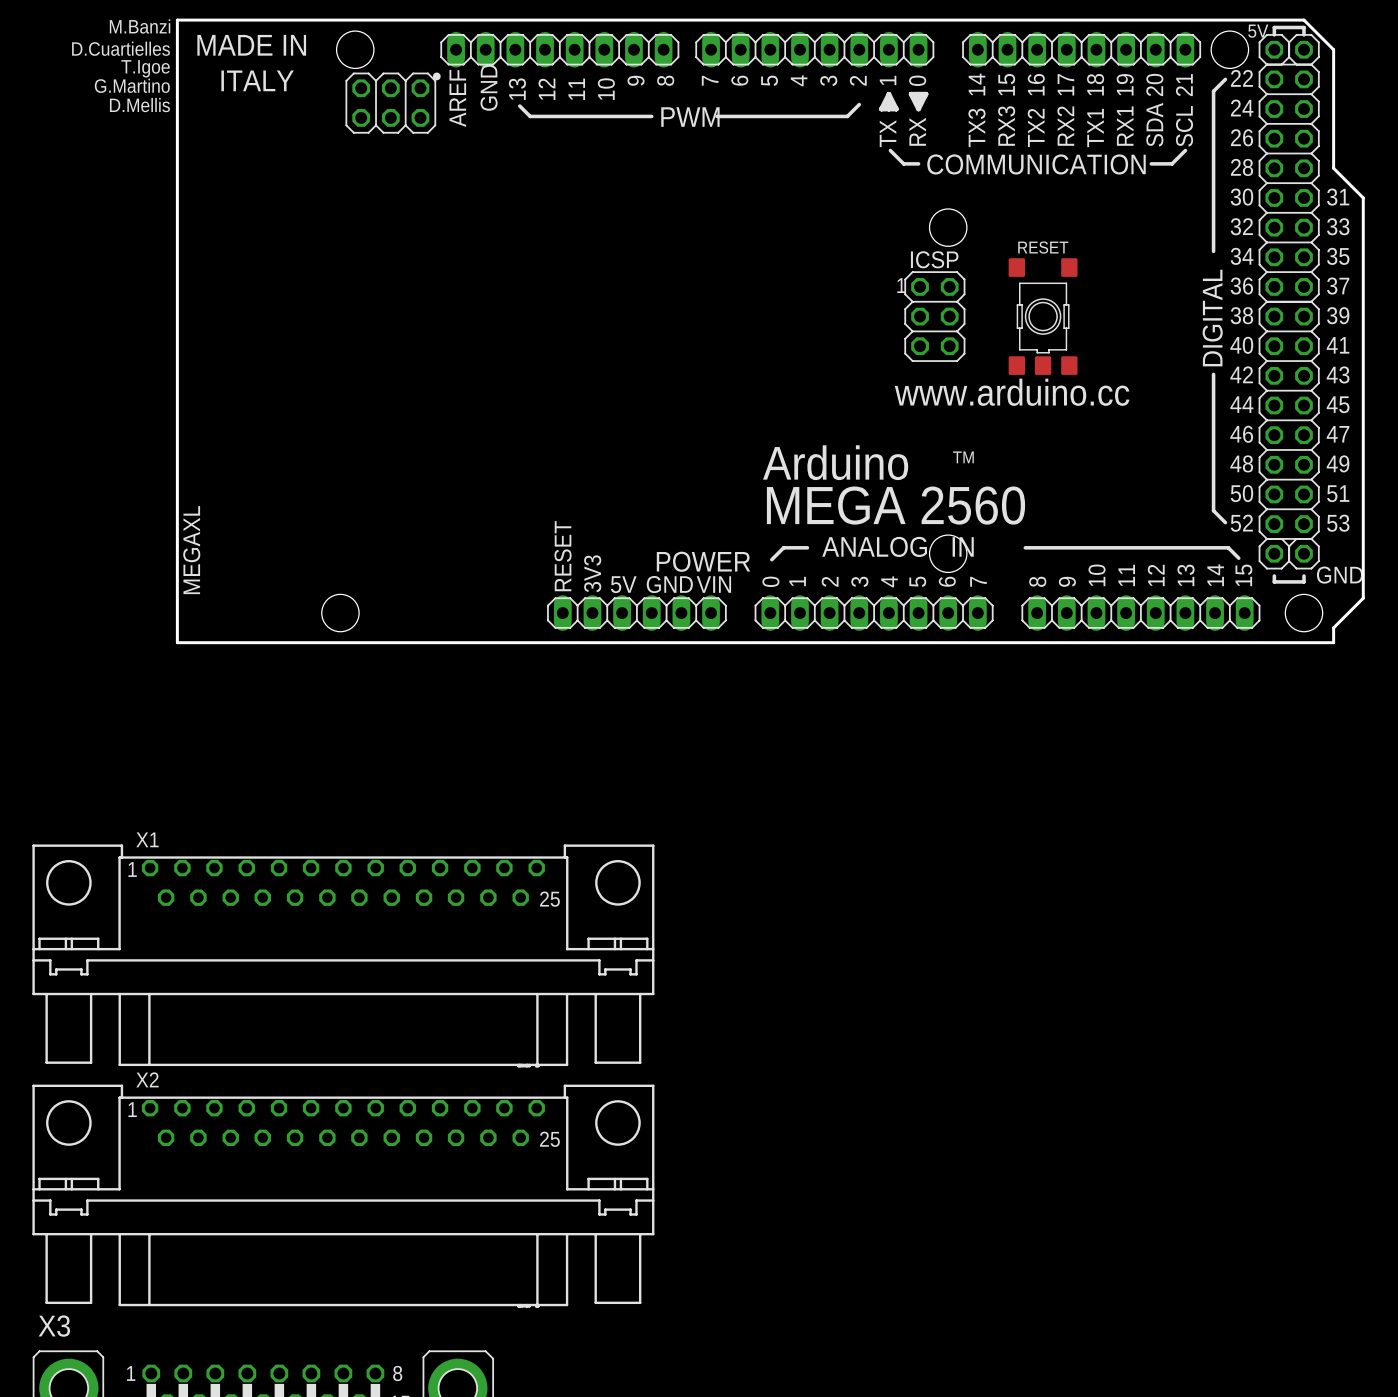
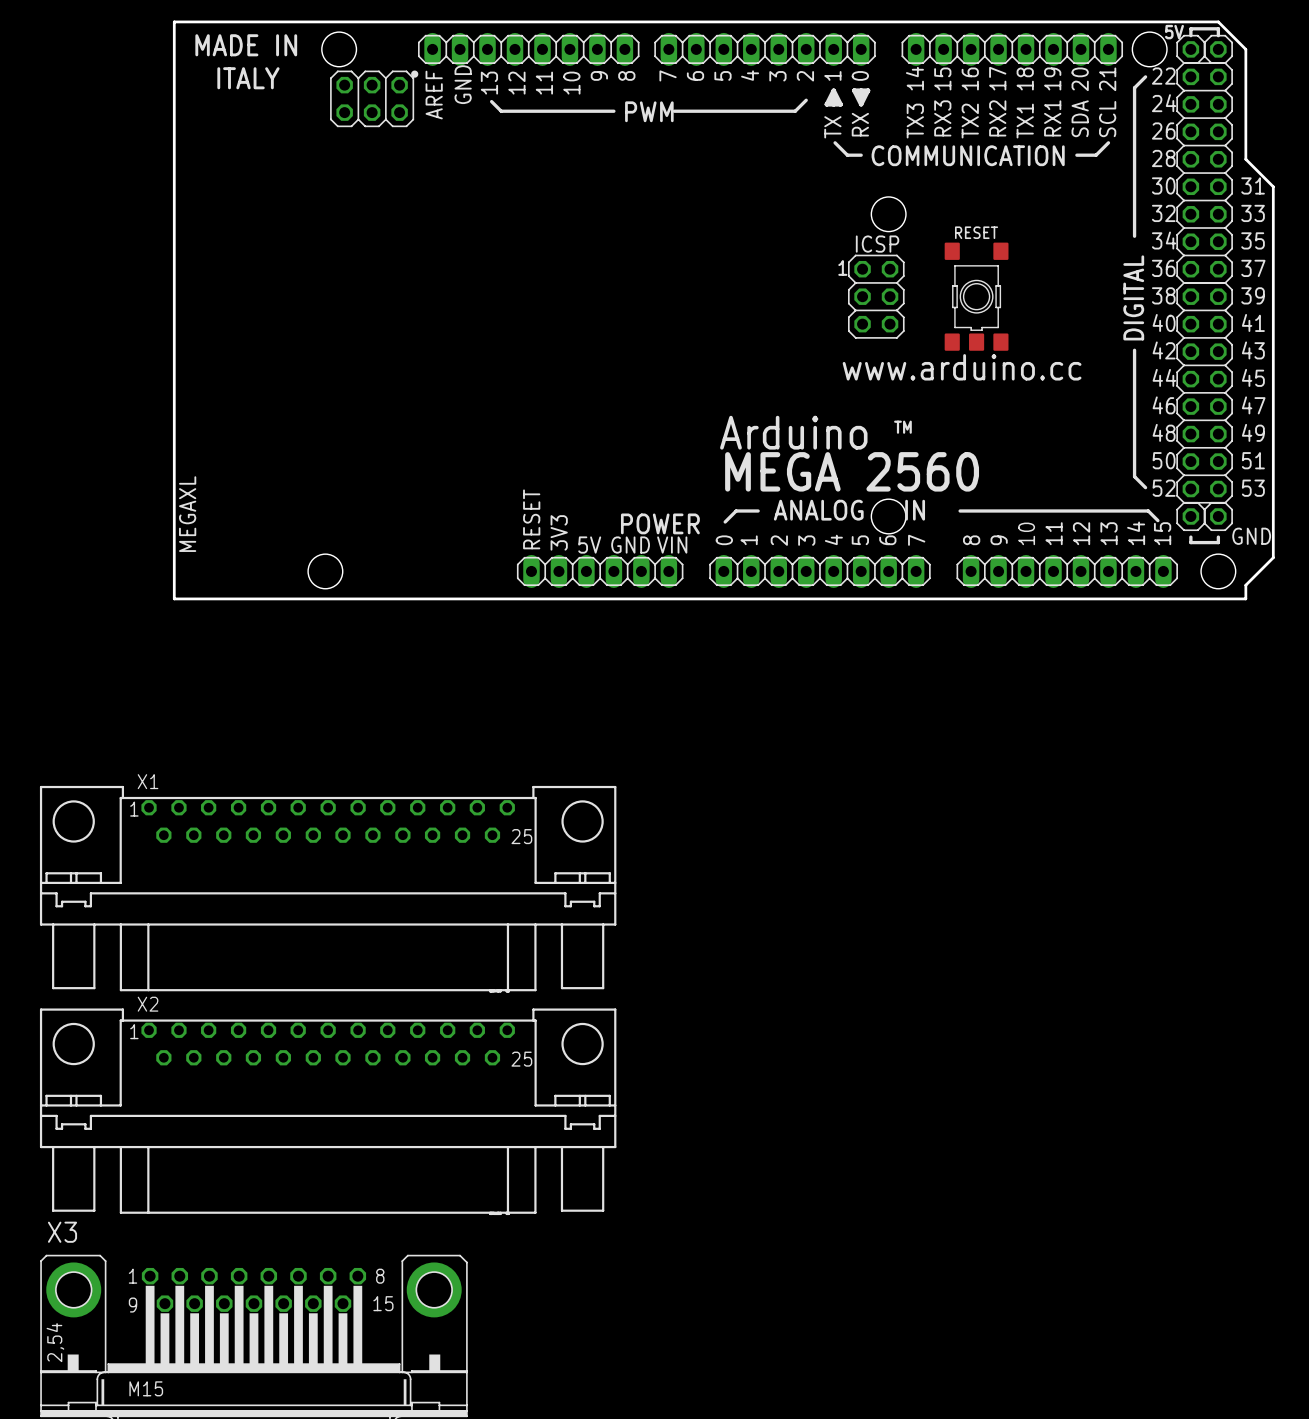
text: M.Banzi (140, 26) -> none
text: D.Cuartielles (121, 48) -> none
text: T.Igoe (145, 68) -> none
text: G.Martino (132, 85) -> none
text: D.Mellis (139, 105) -> none

